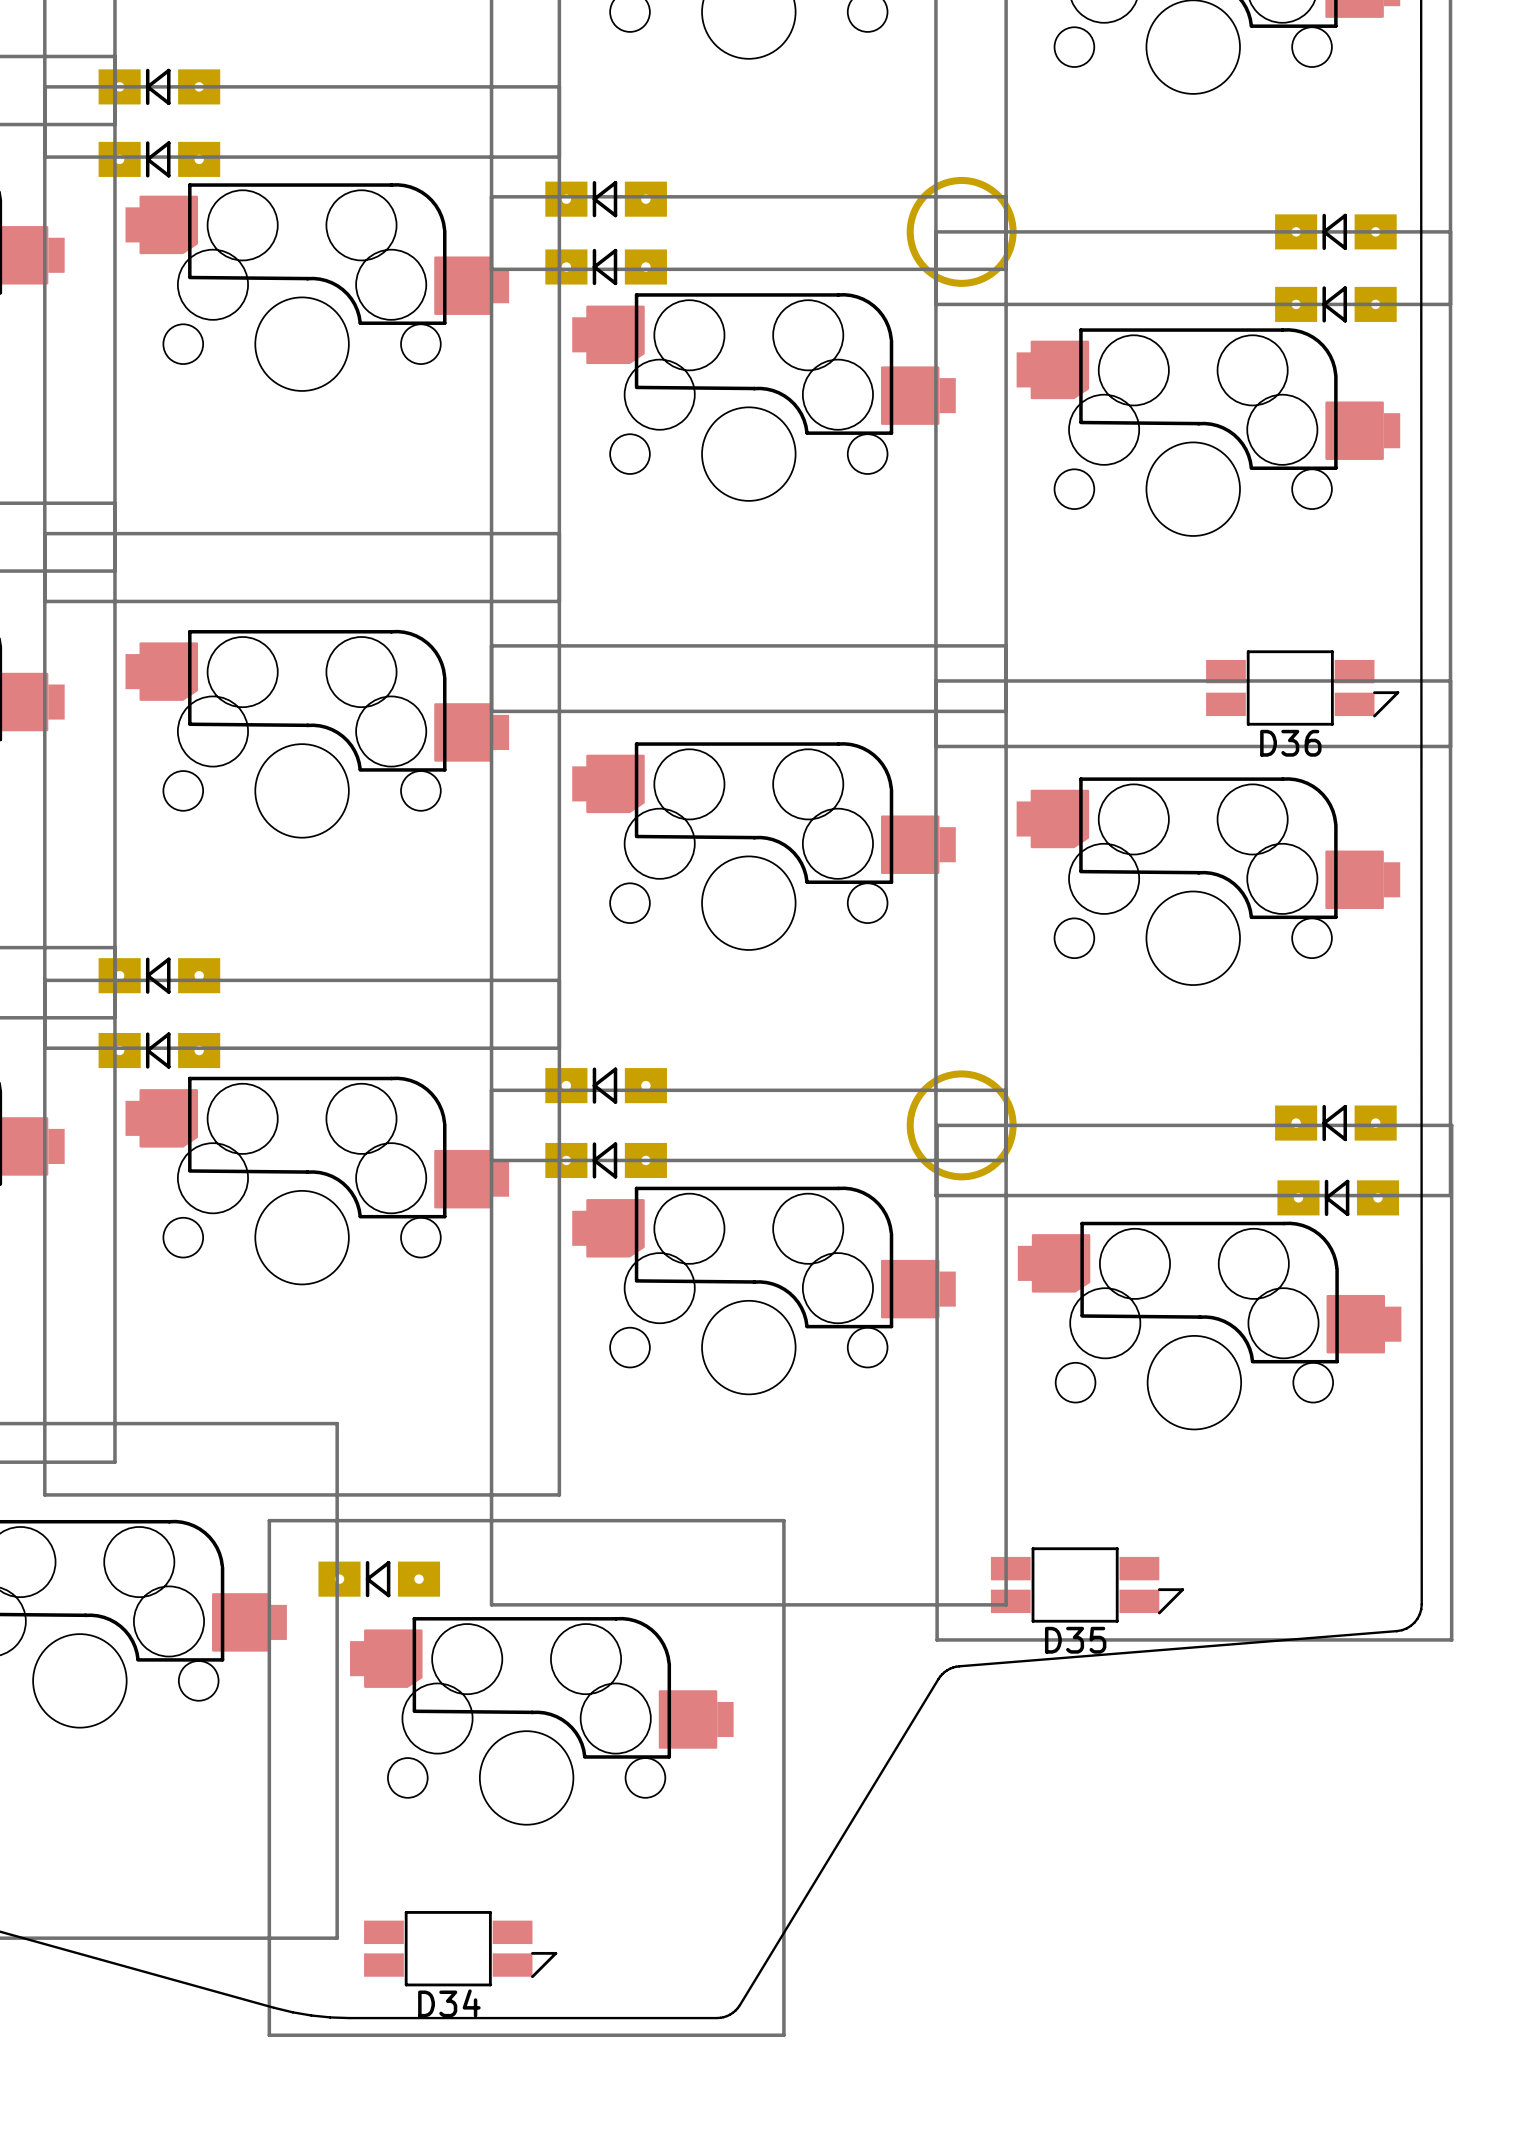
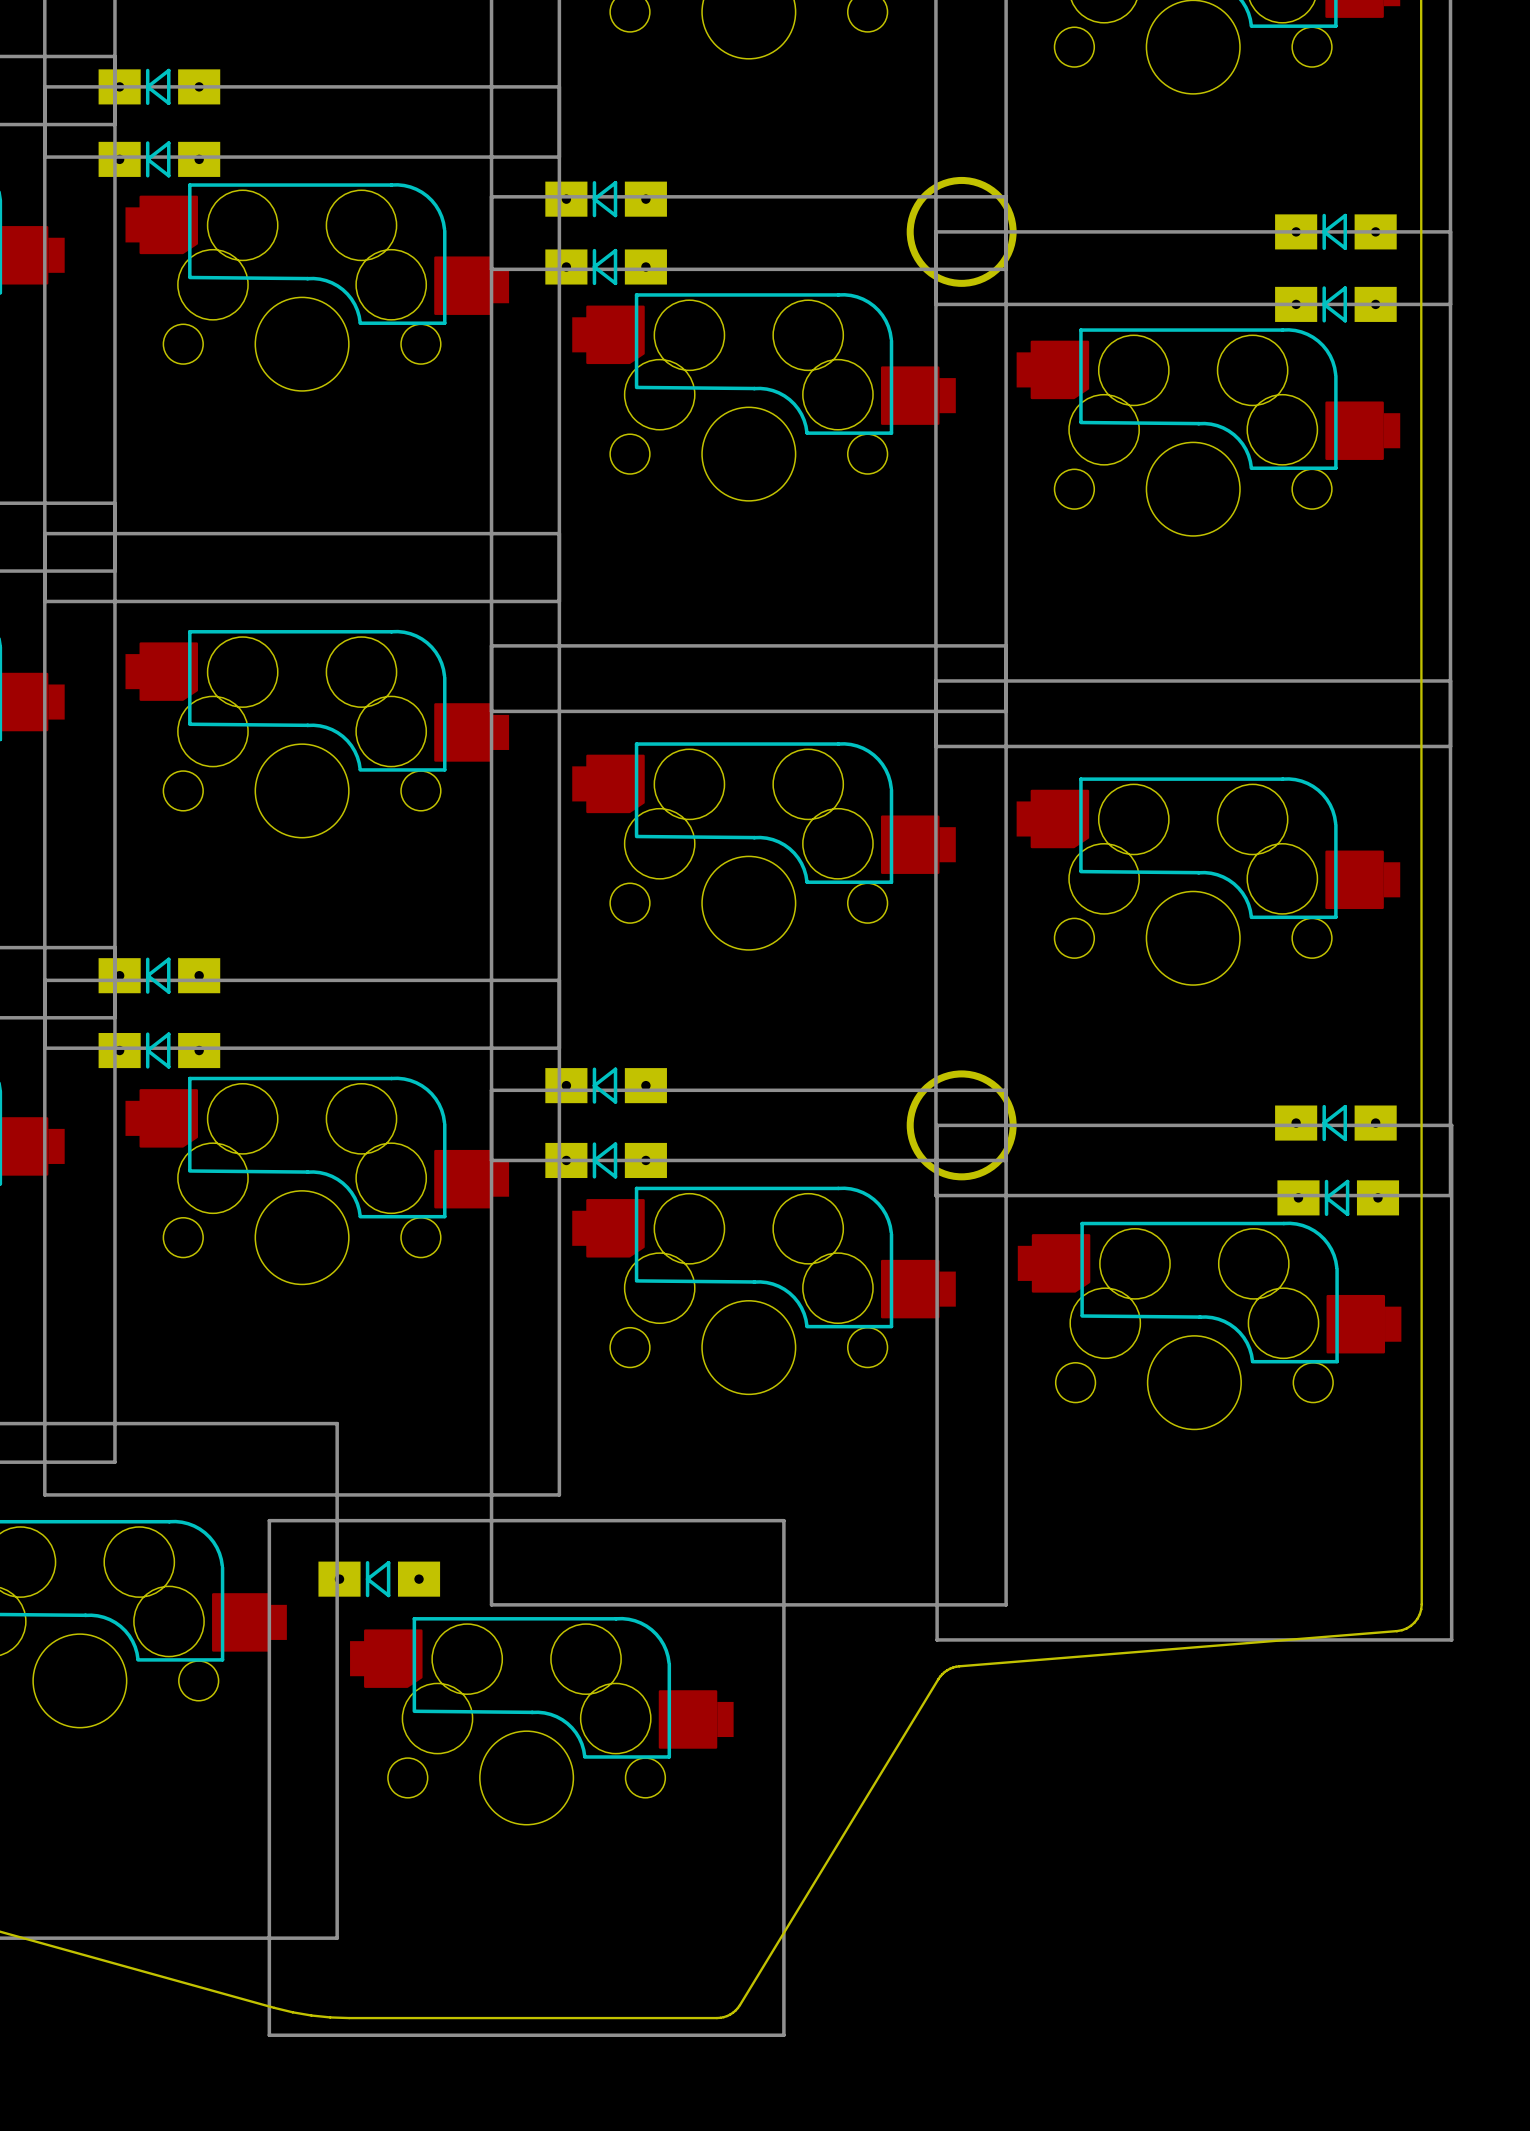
D36: (1302, 688) -> none
D35: (1087, 1584) -> none
D34: (460, 1948) -> none

